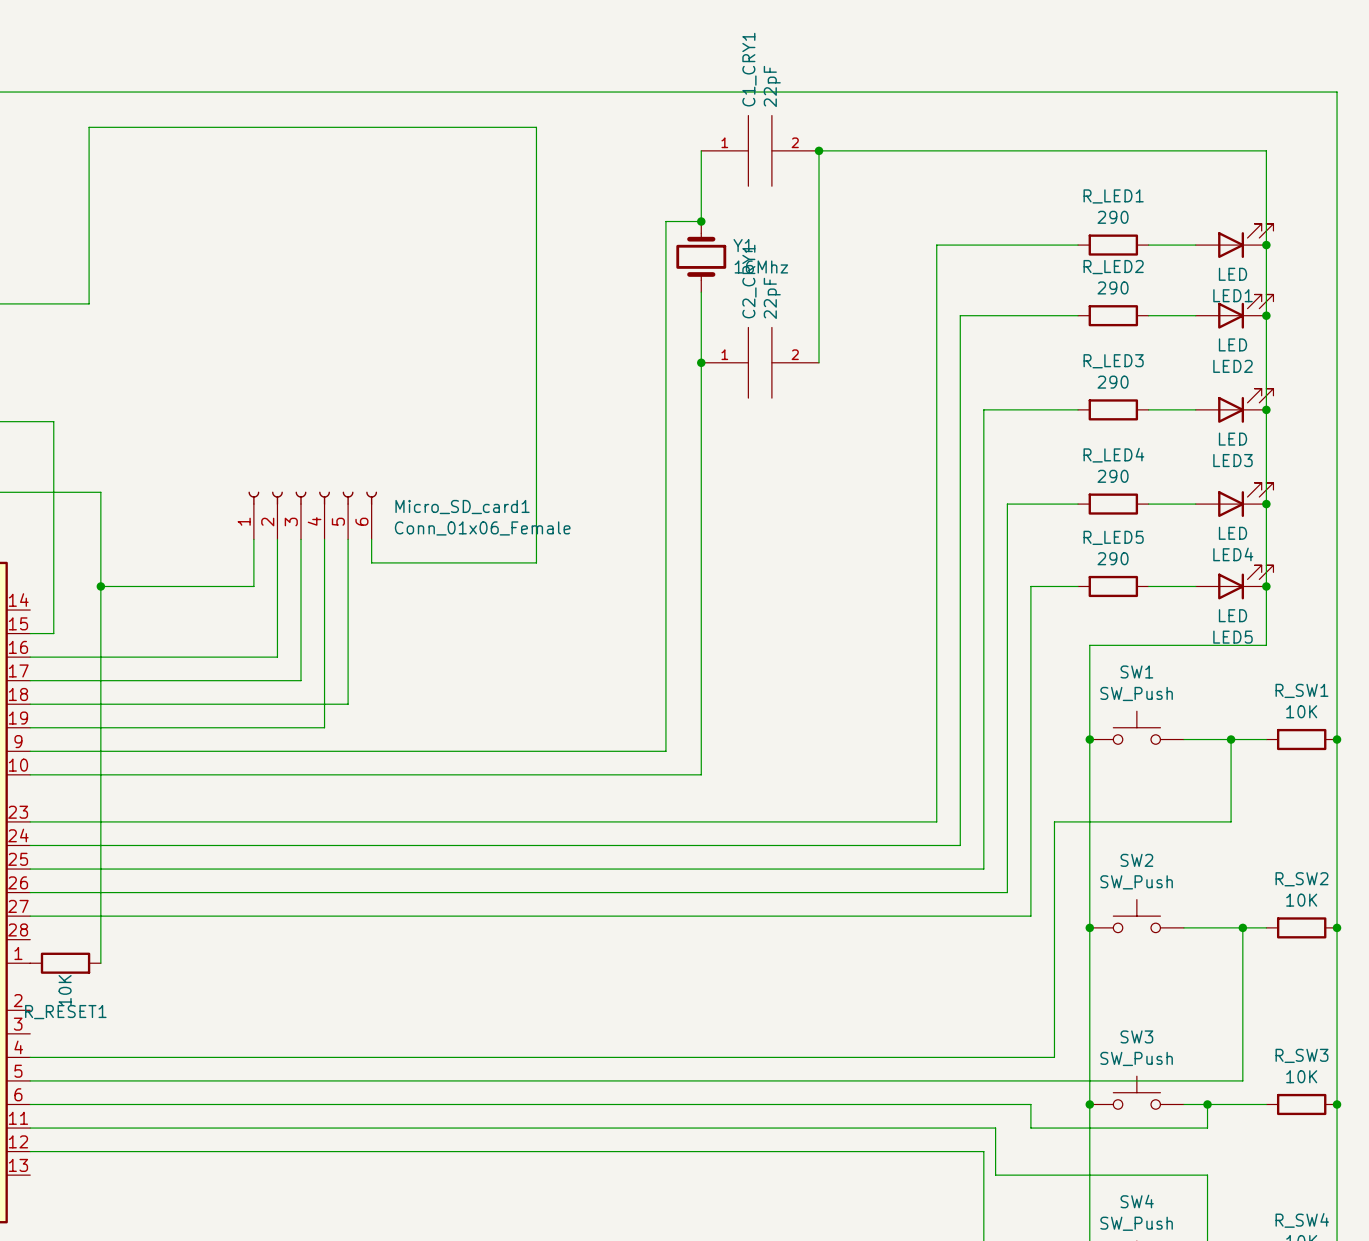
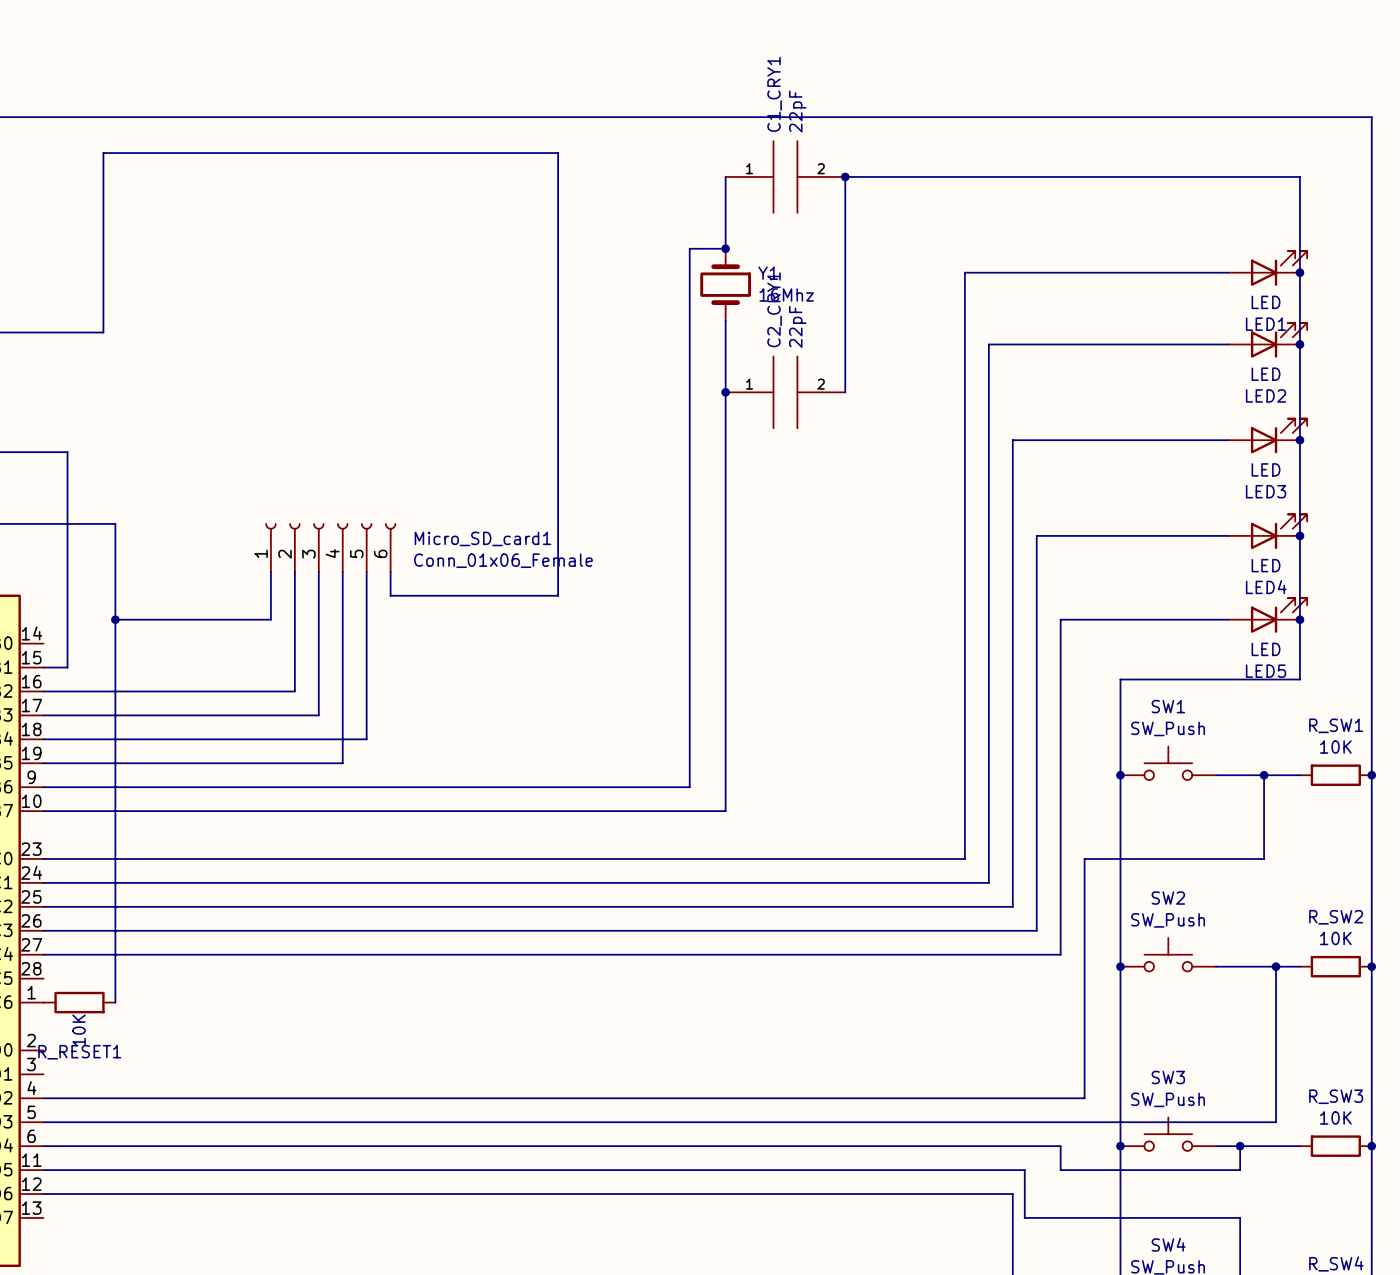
wire: none -> (1108, 272) (1180, 272)
R_LED1: 290 (1113, 245) -> none
wire: none -> (1108, 344) (1180, 344)
R_LED2: 290 (1113, 315) -> none
wire: none -> (1108, 440) (1180, 440)
R_LED3: 290 (1113, 409) -> none
wire: none -> (1108, 535) (1180, 535)
R_LED4: 290 (1113, 504) -> none
wire: none -> (1108, 619) (1180, 619)
R_LED5: 290 (1113, 586) -> none

